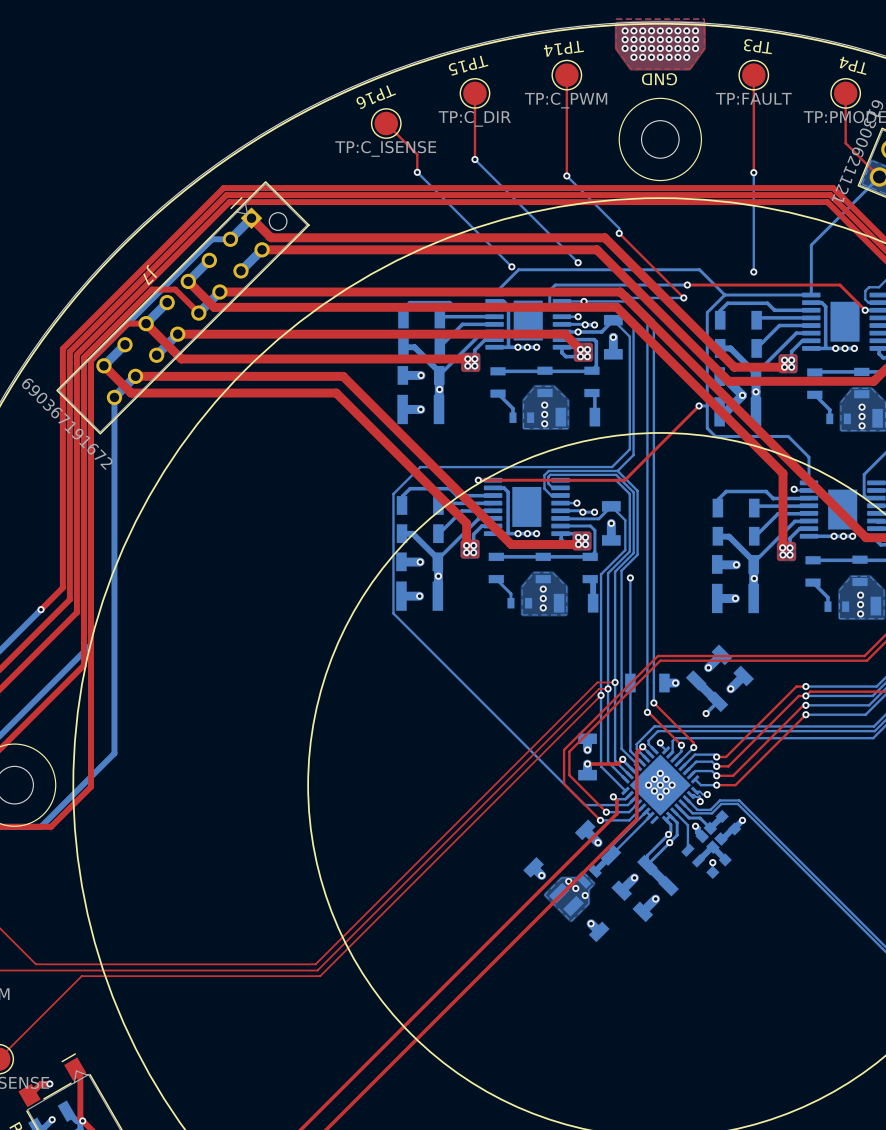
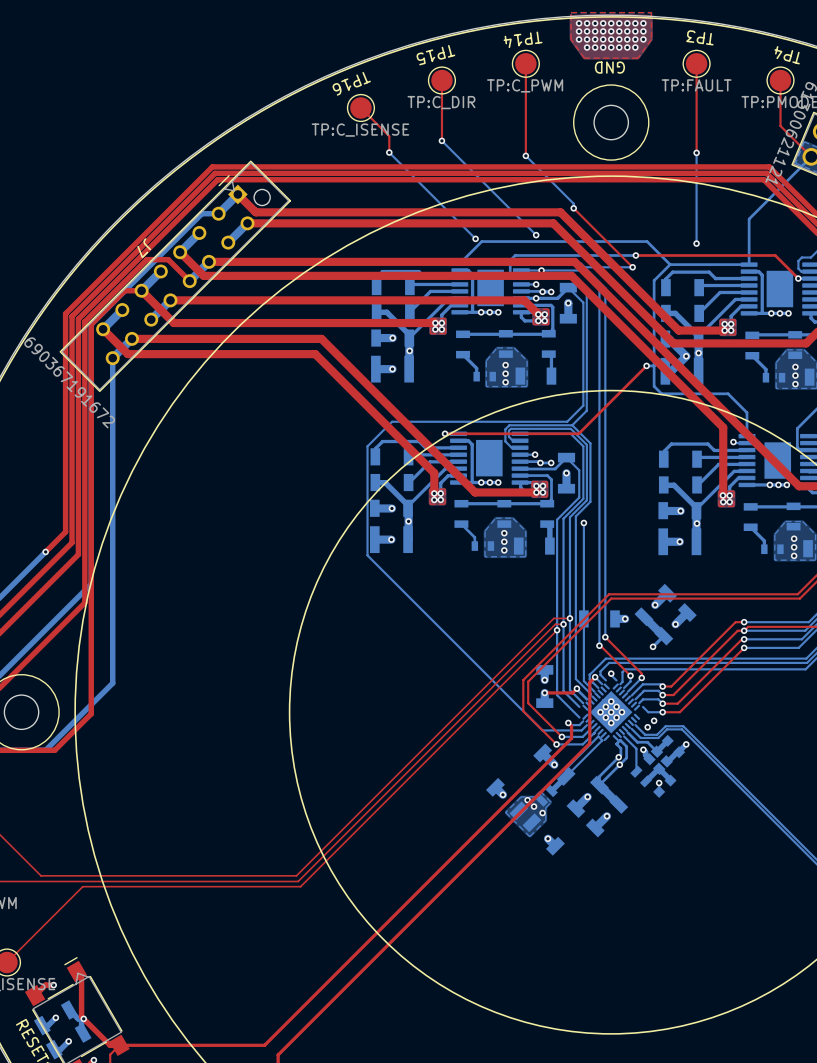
part footprint: [621, 746, 700, 825] -> [582, 683, 641, 742]
bottom track: (695, 790) (707, 794) -> none
bottom track: (691, 795) (699, 796) (700, 801) -> none

